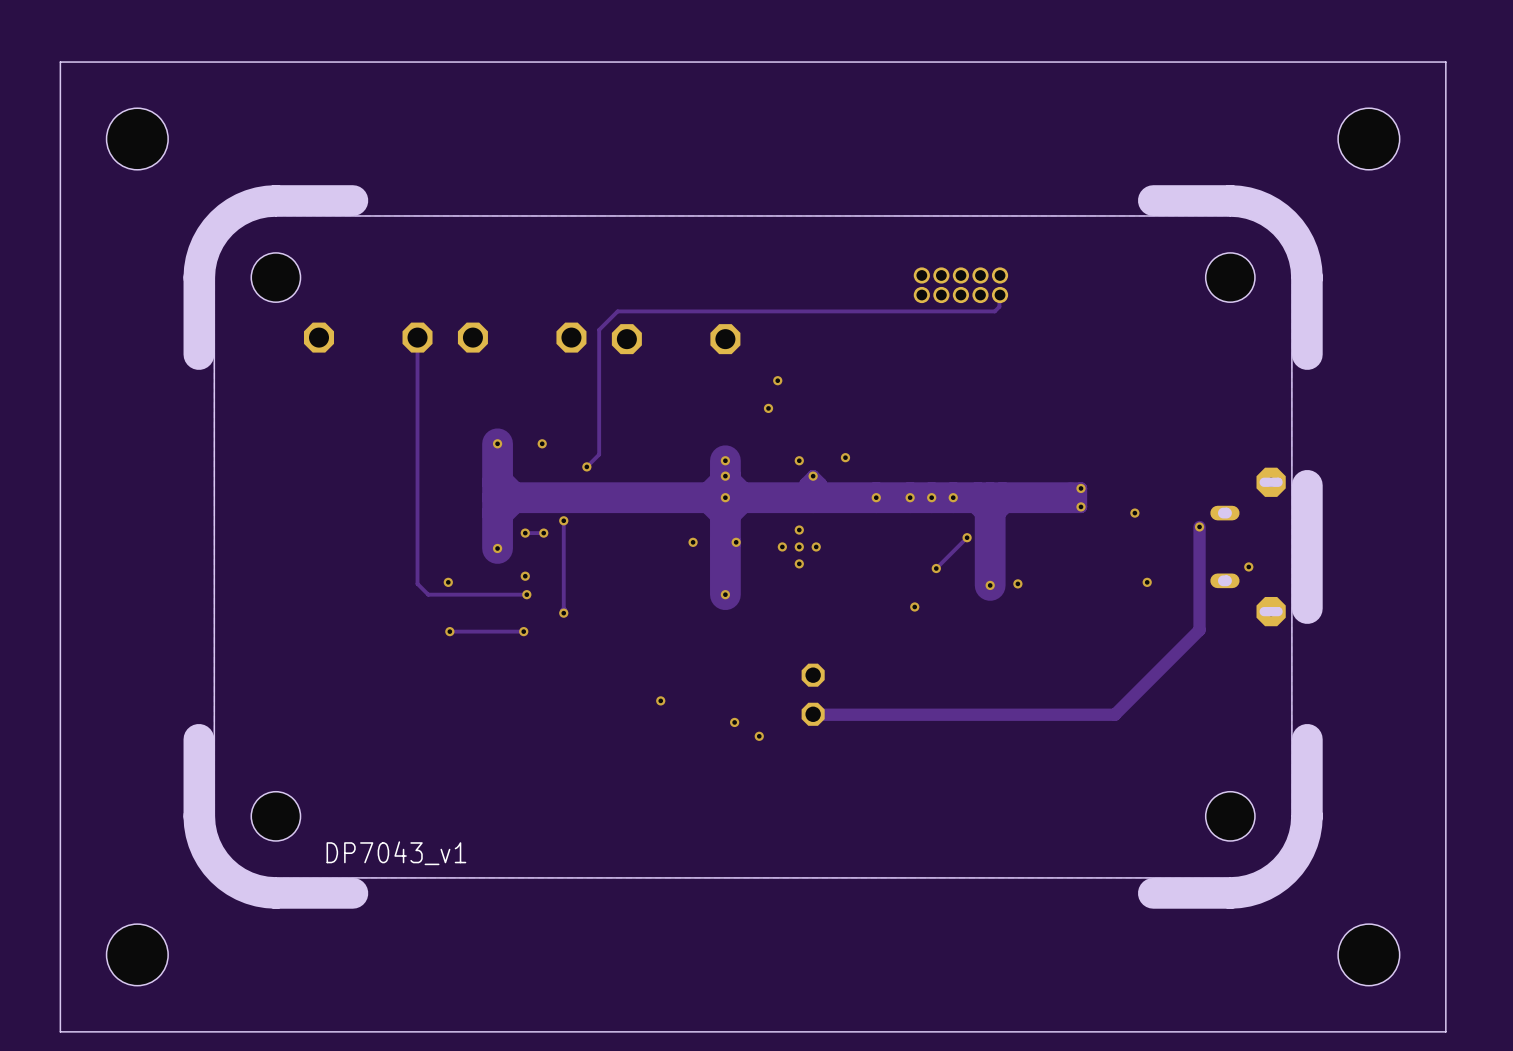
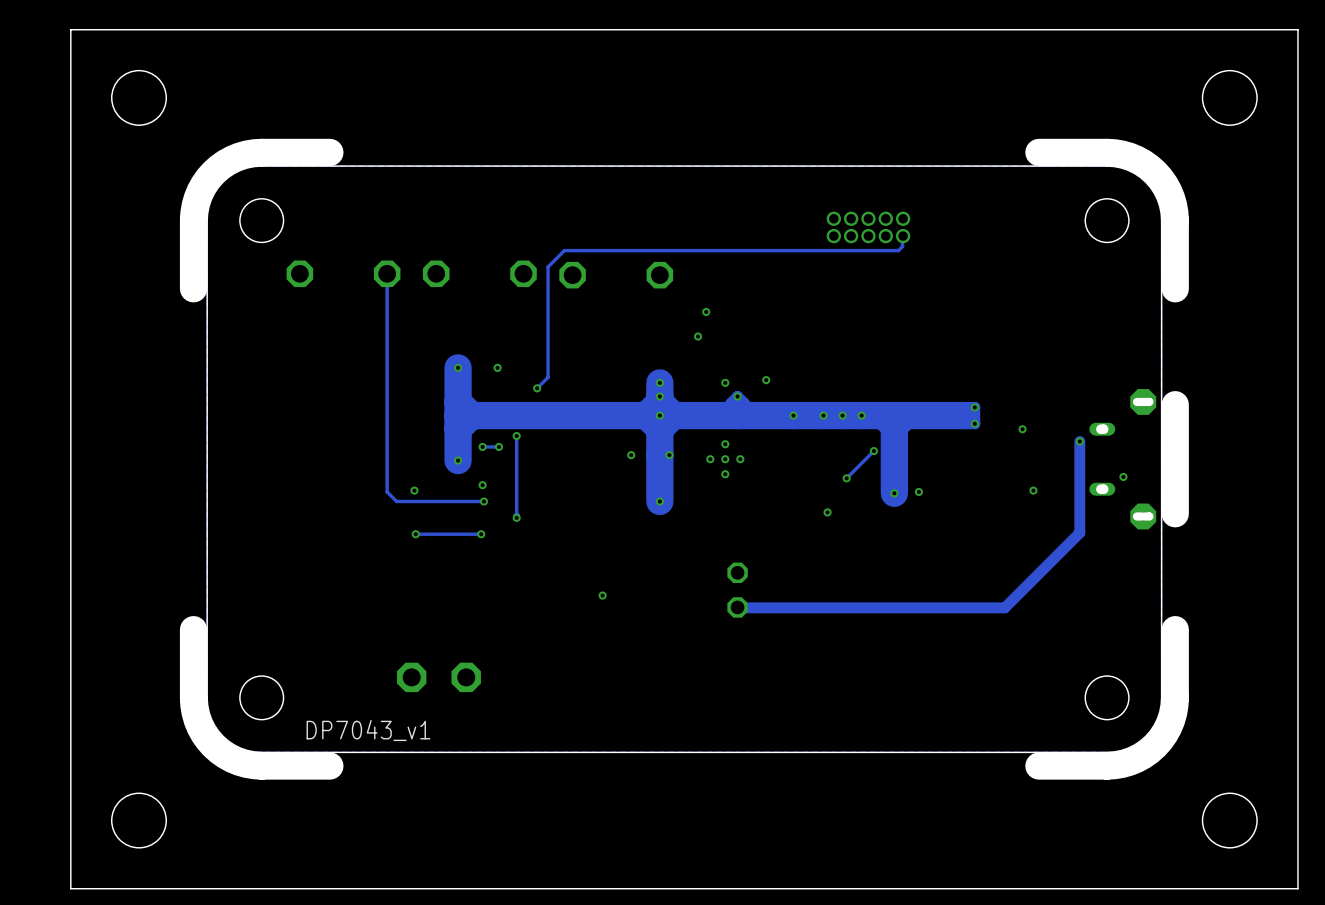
via: (734, 722) -> none
via: (759, 736) -> none
part: none -> (411, 677)
part: none -> (466, 677)

